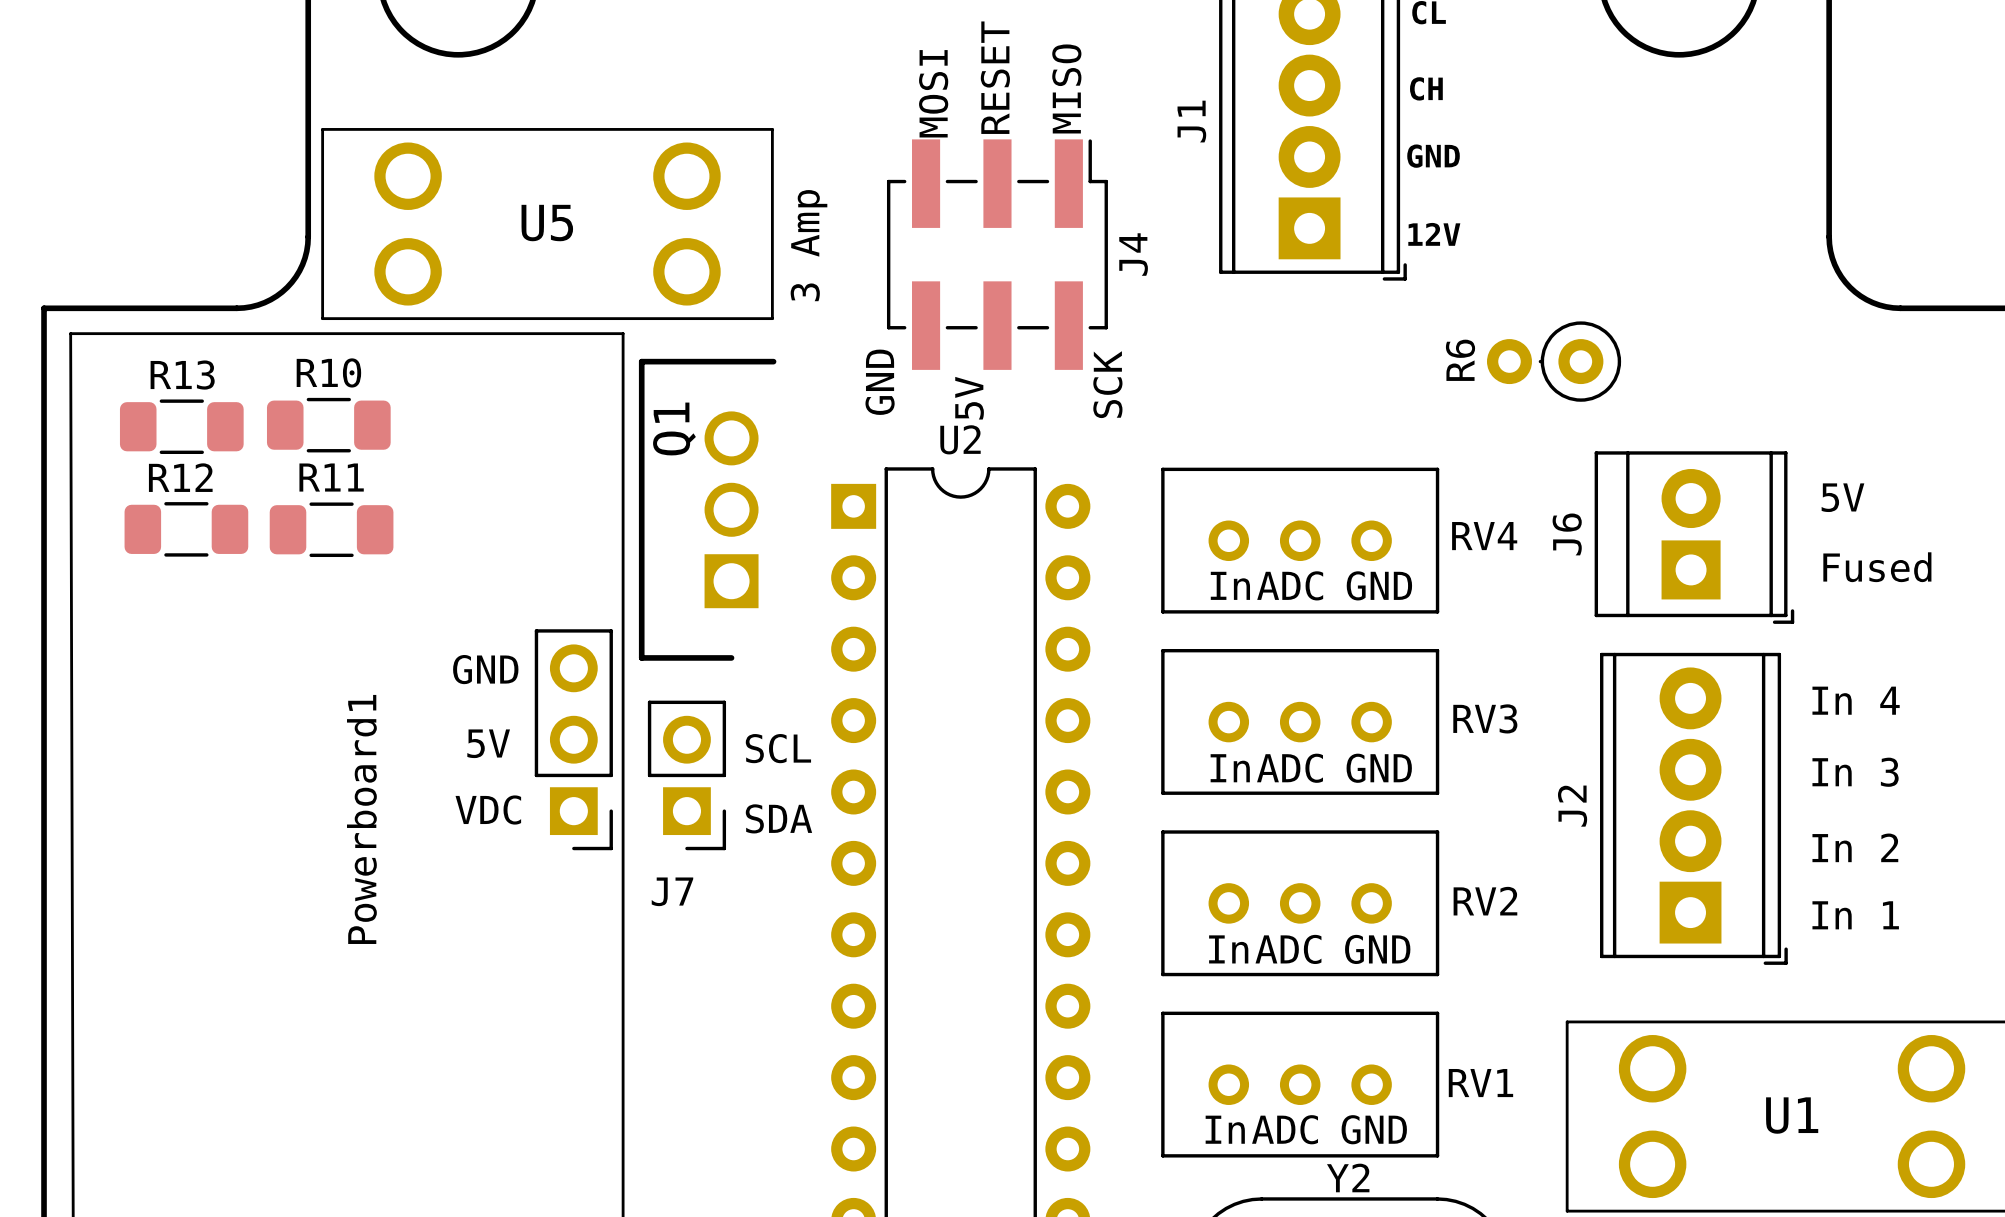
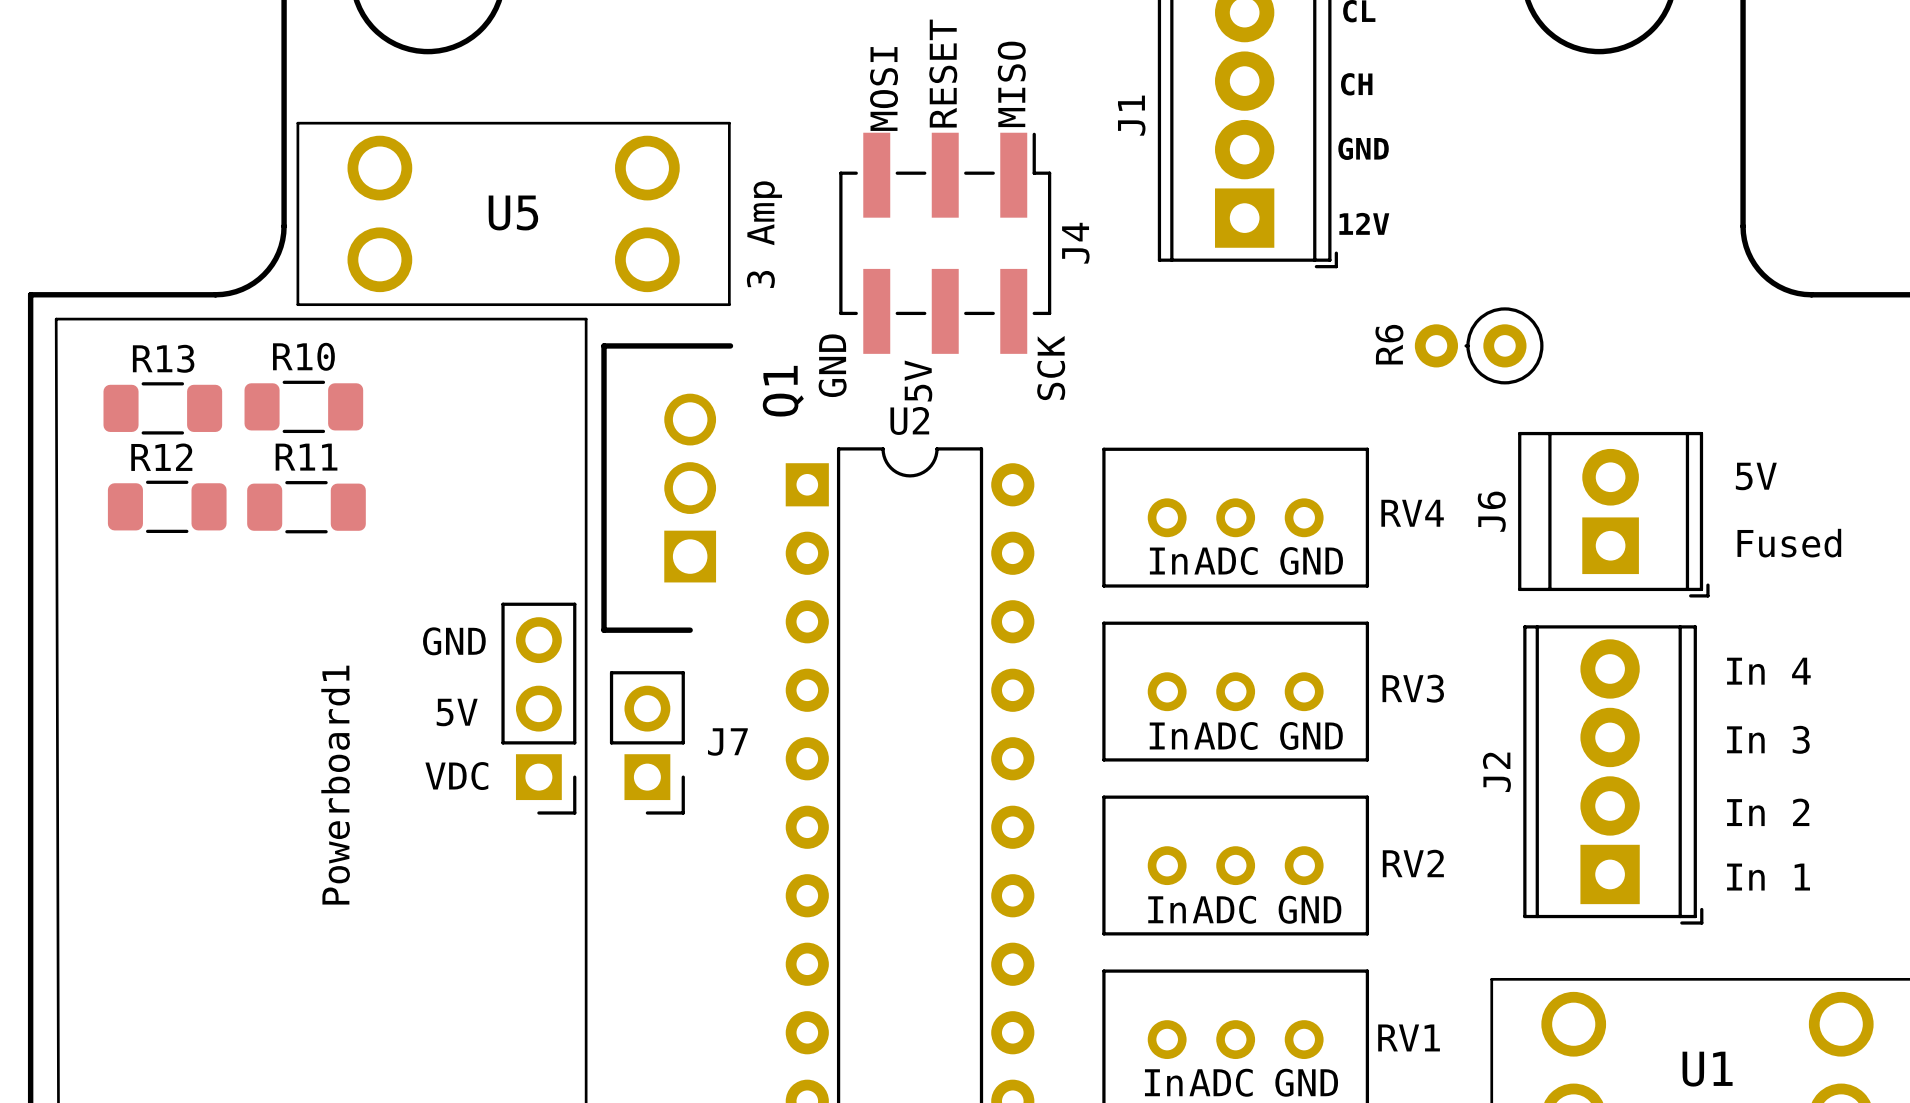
Q1 name position: Q1 (674, 428) -> Q1 (783, 391)
text: SCL (778, 748) -> none
text: SDA (778, 818) -> none
J7 name position: J7 (672, 891) -> J7 (727, 742)

